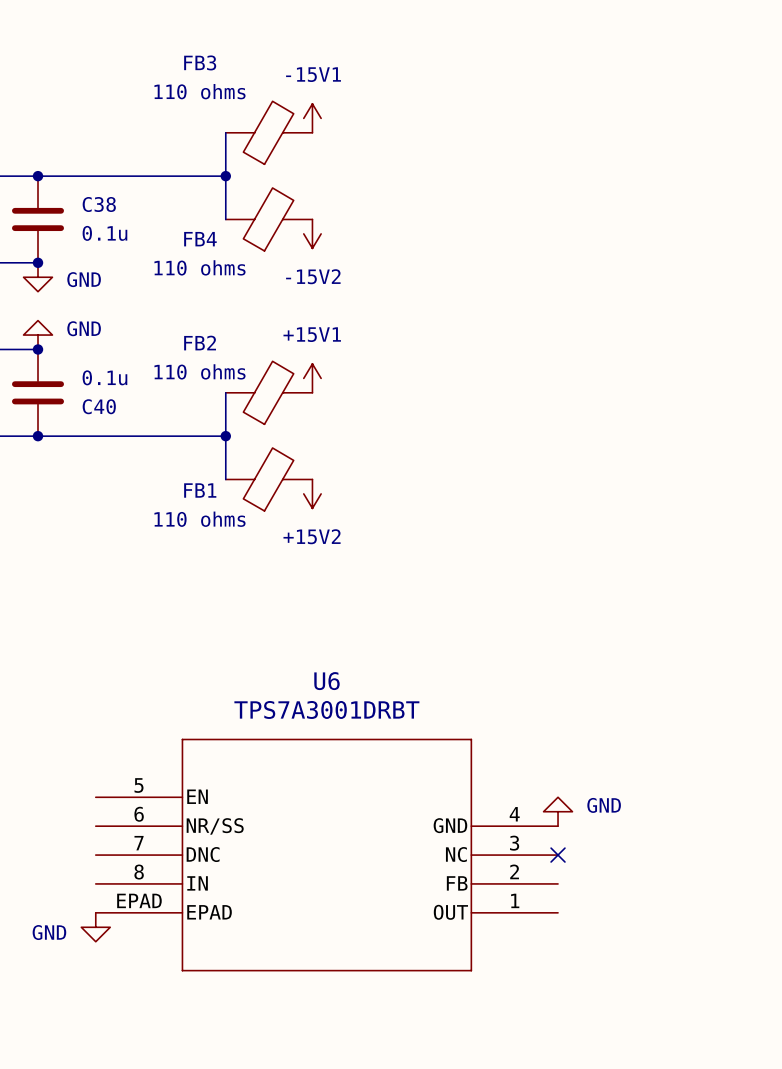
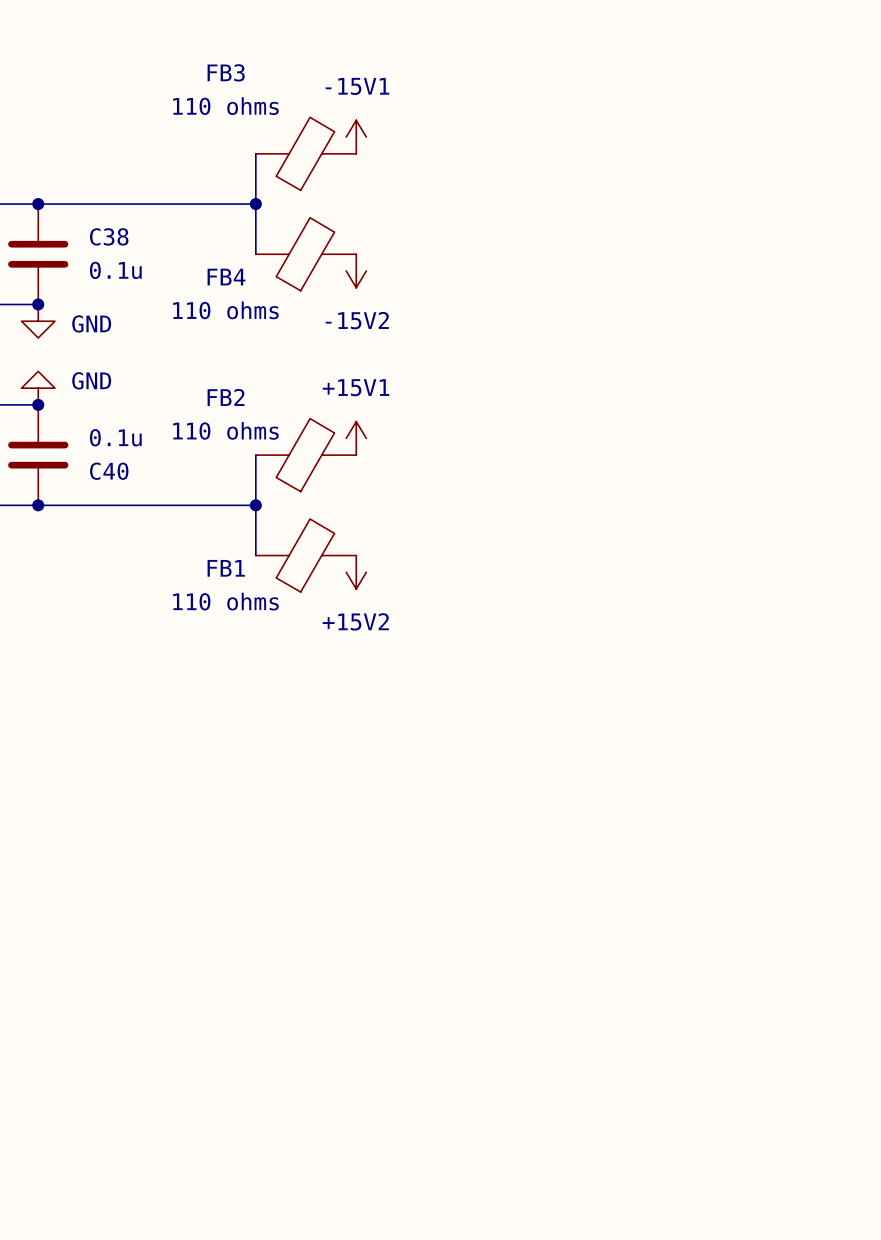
power symbol: GND (558, 811) -> none
U6: TPS7A3001DRBT (326, 855) -> none
no-connect mark: (558, 855) -> none
power symbol: GND (95, 927) -> none

